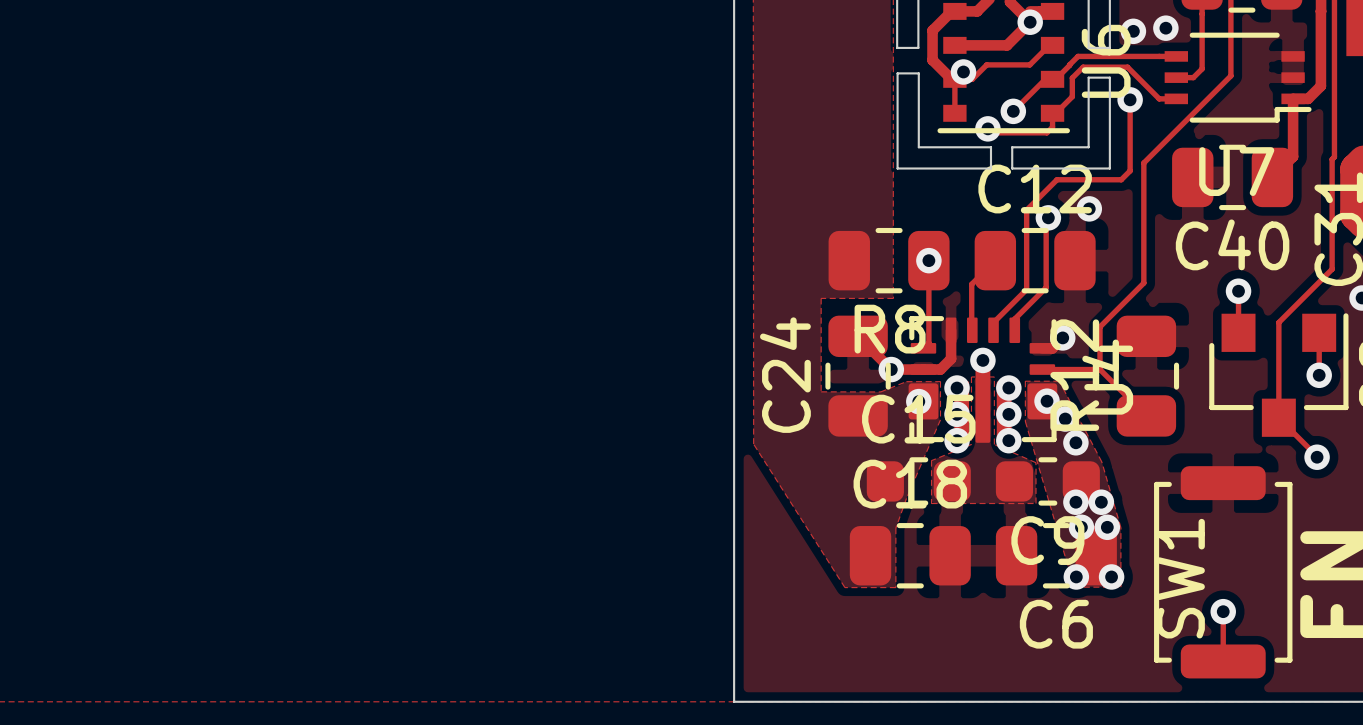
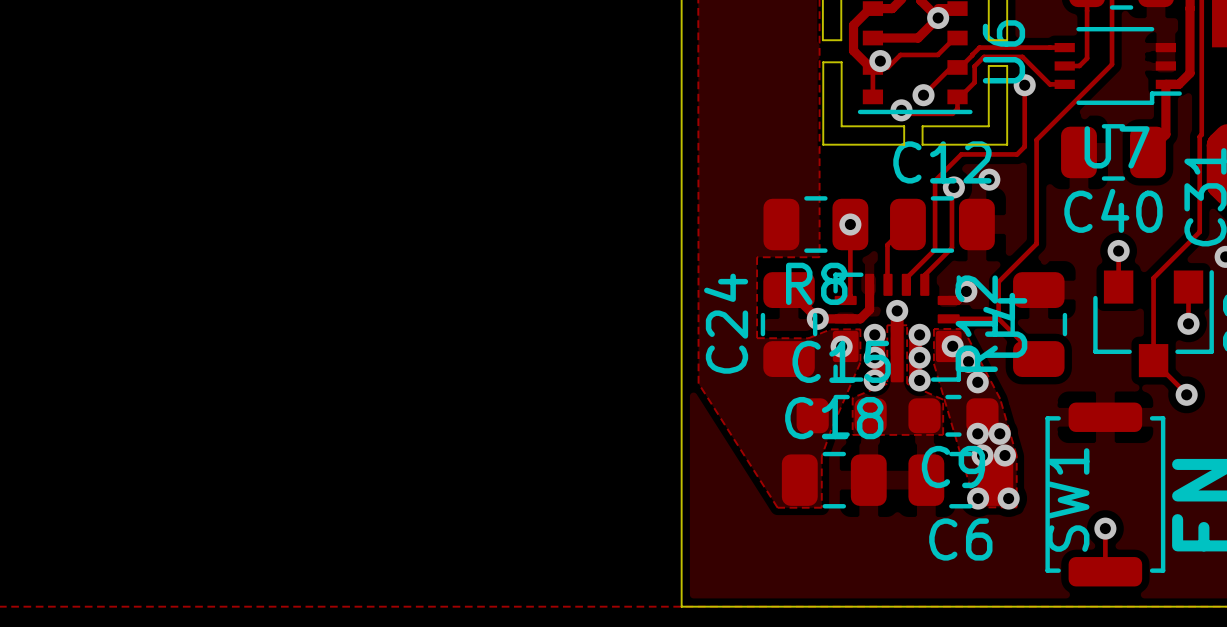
via: (1165, 28) -> none
via: (1133, 31) -> none

